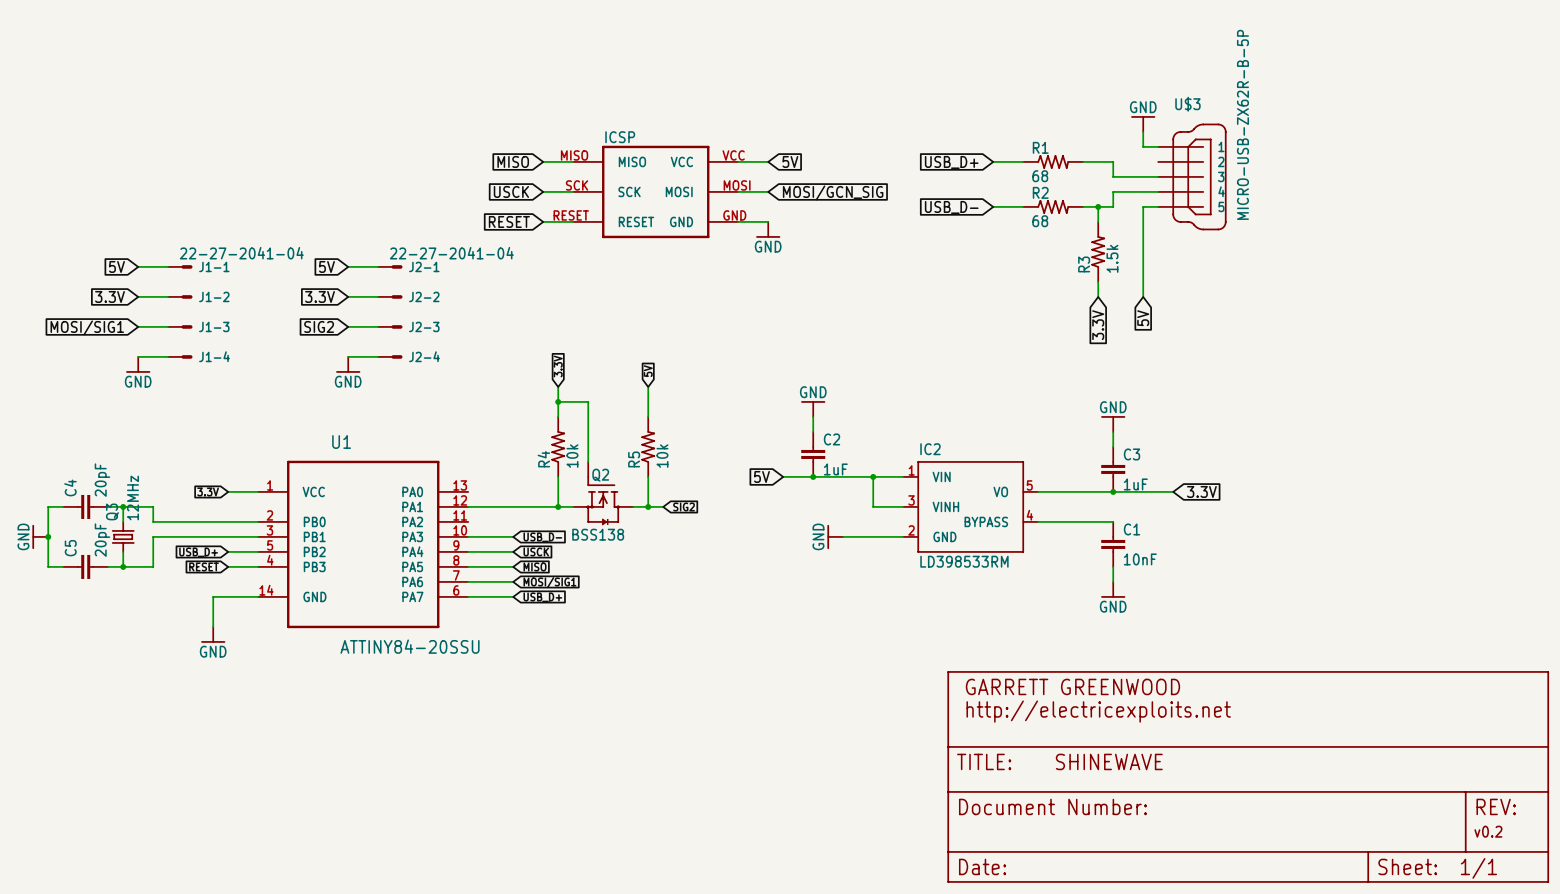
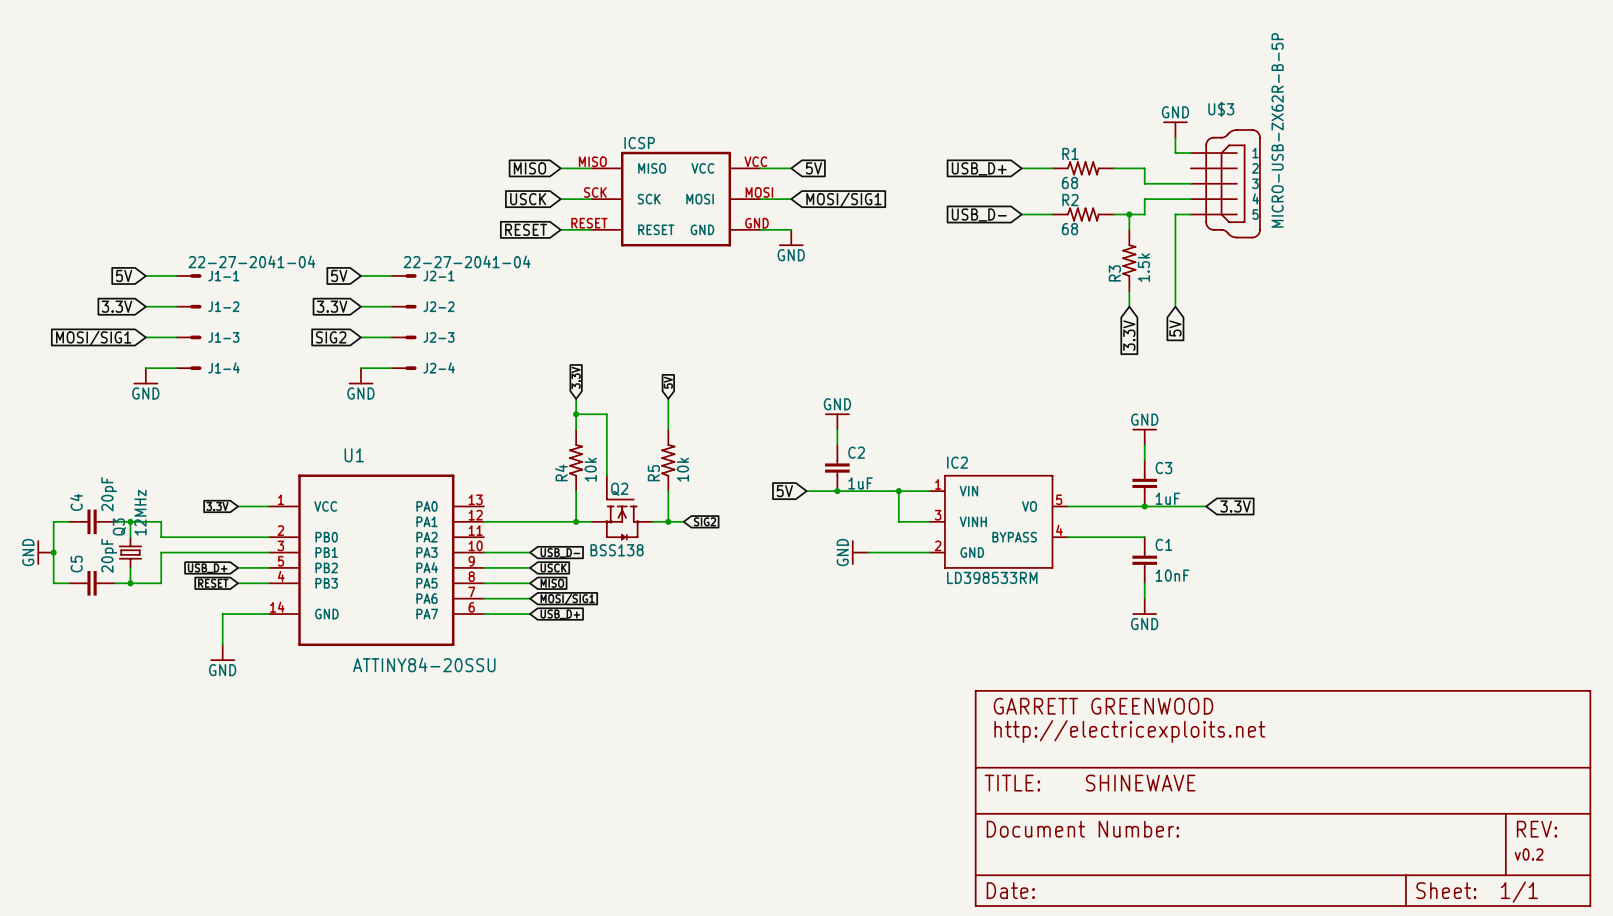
global label: MOSI/GCN_SIG (833, 192) -> MOSI/SIG1 (843, 200)

